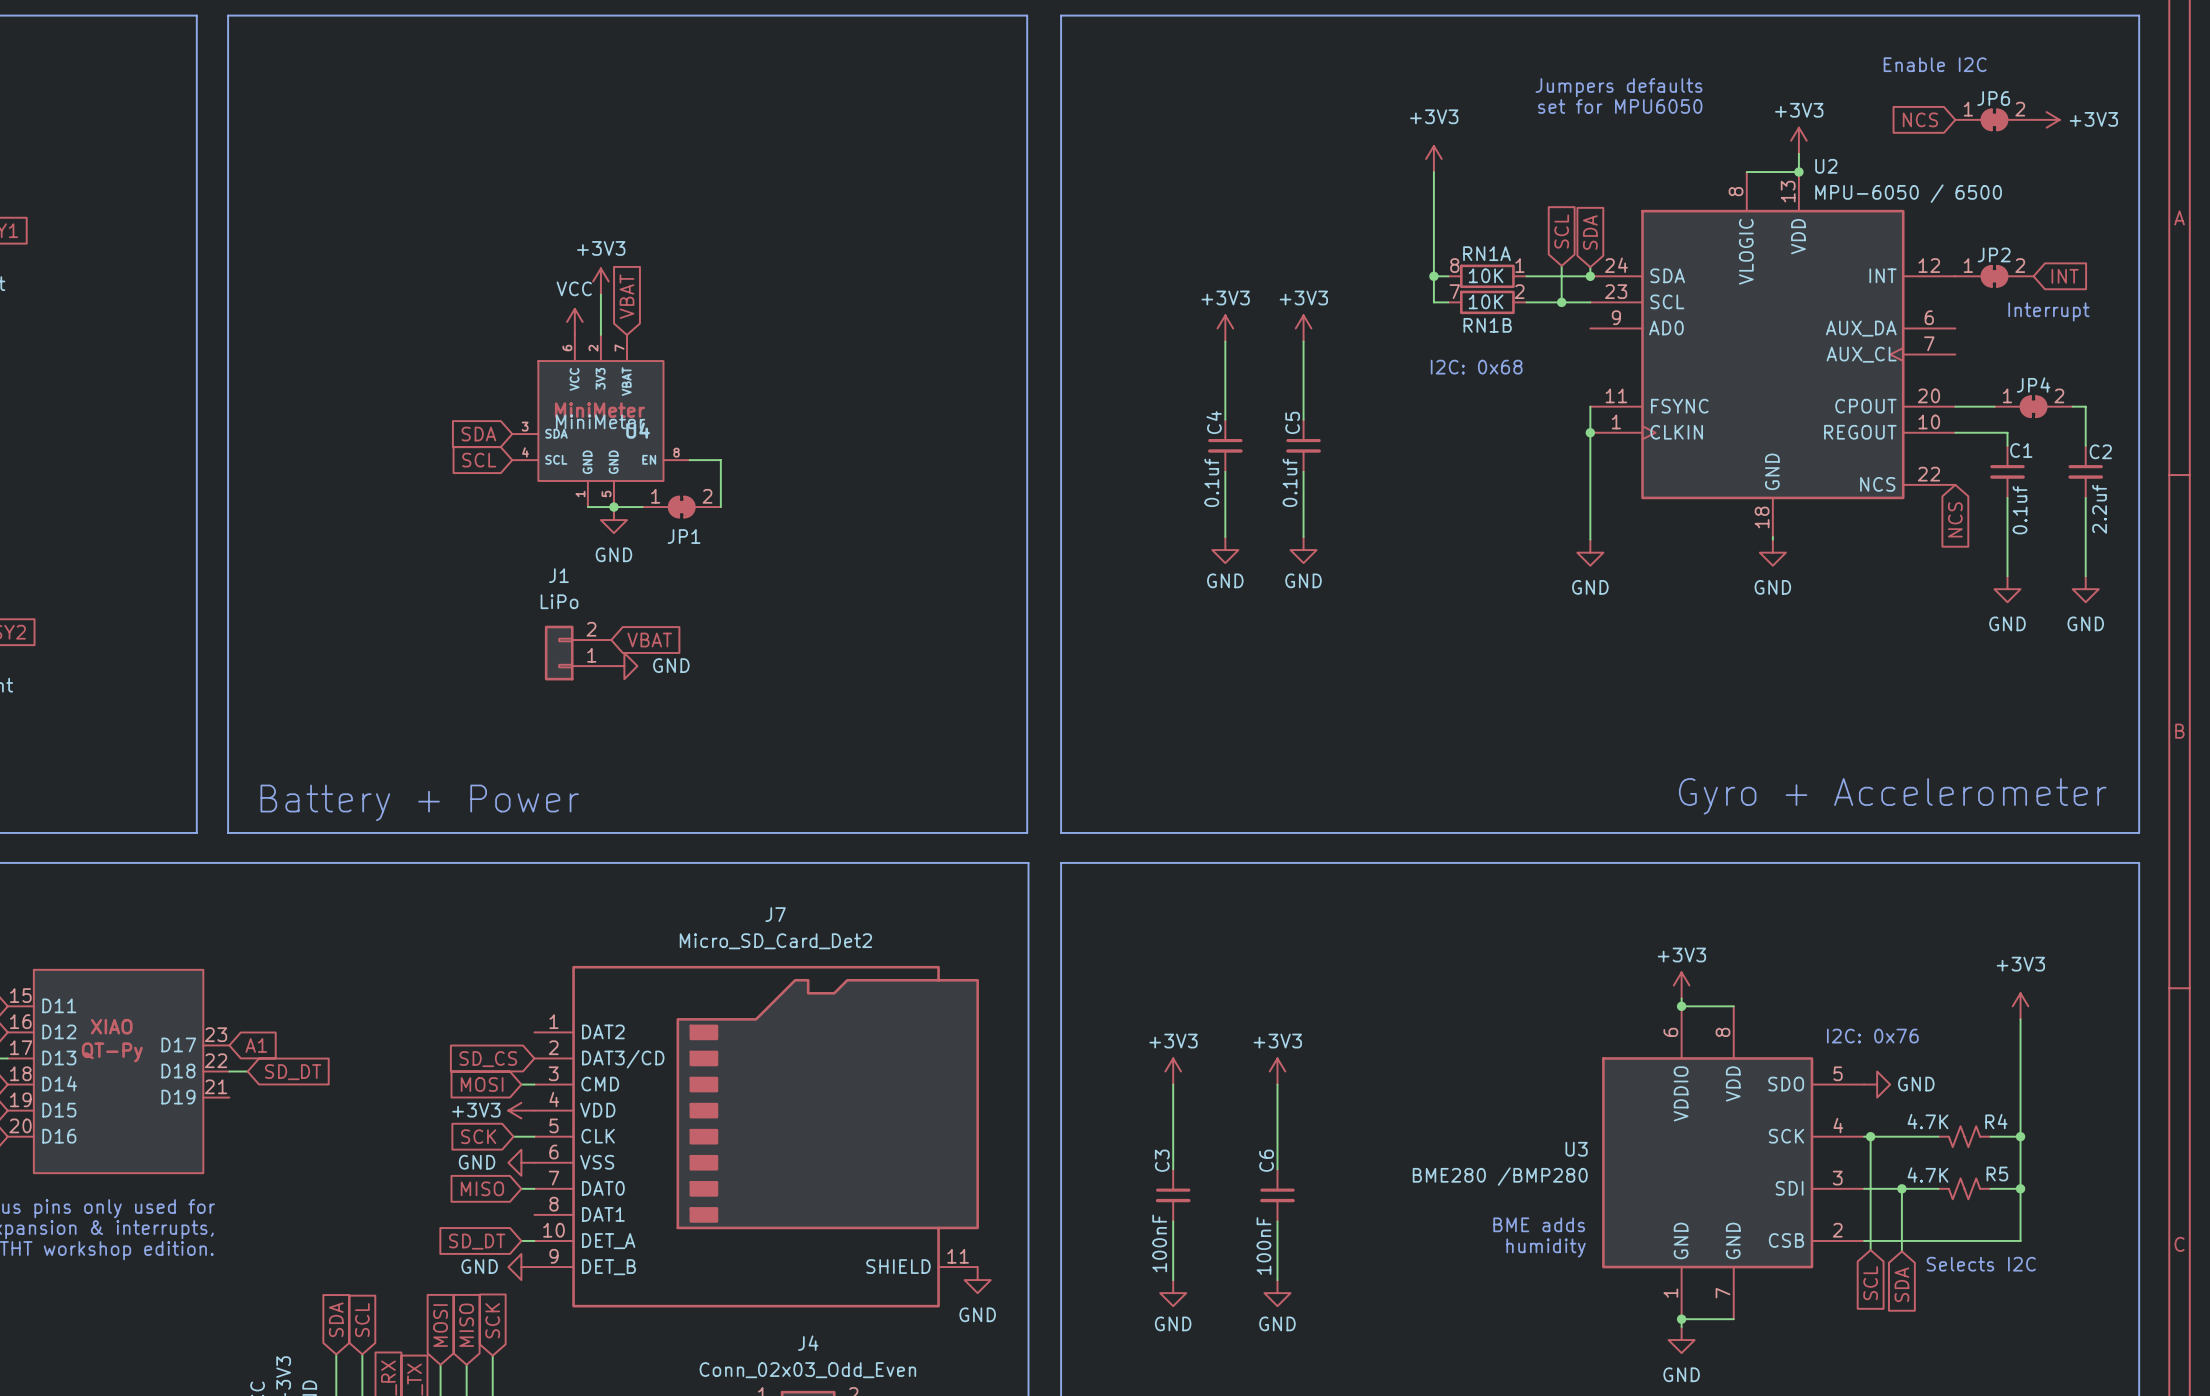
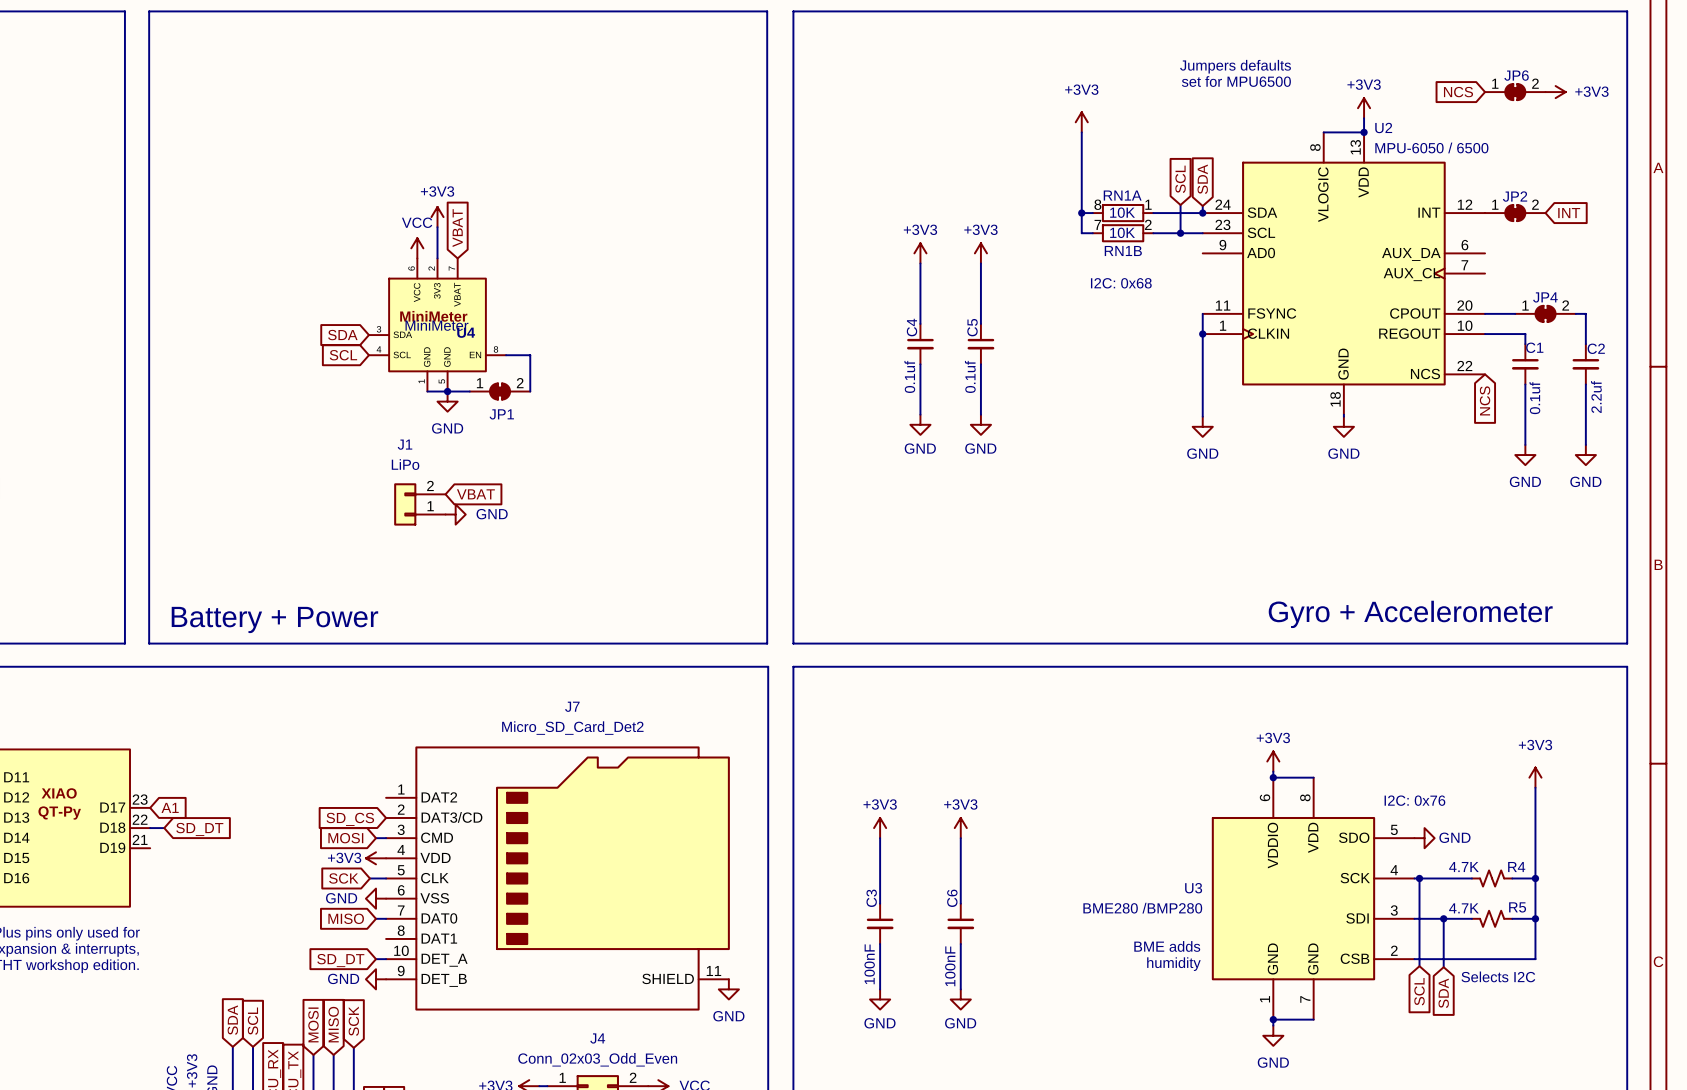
text: Enable I2C (1935, 64) -> none
text: set for MPU6050 (1620, 106) -> set for MPU6500 (1236, 81)
text: Interrupt (2048, 311) -> none

